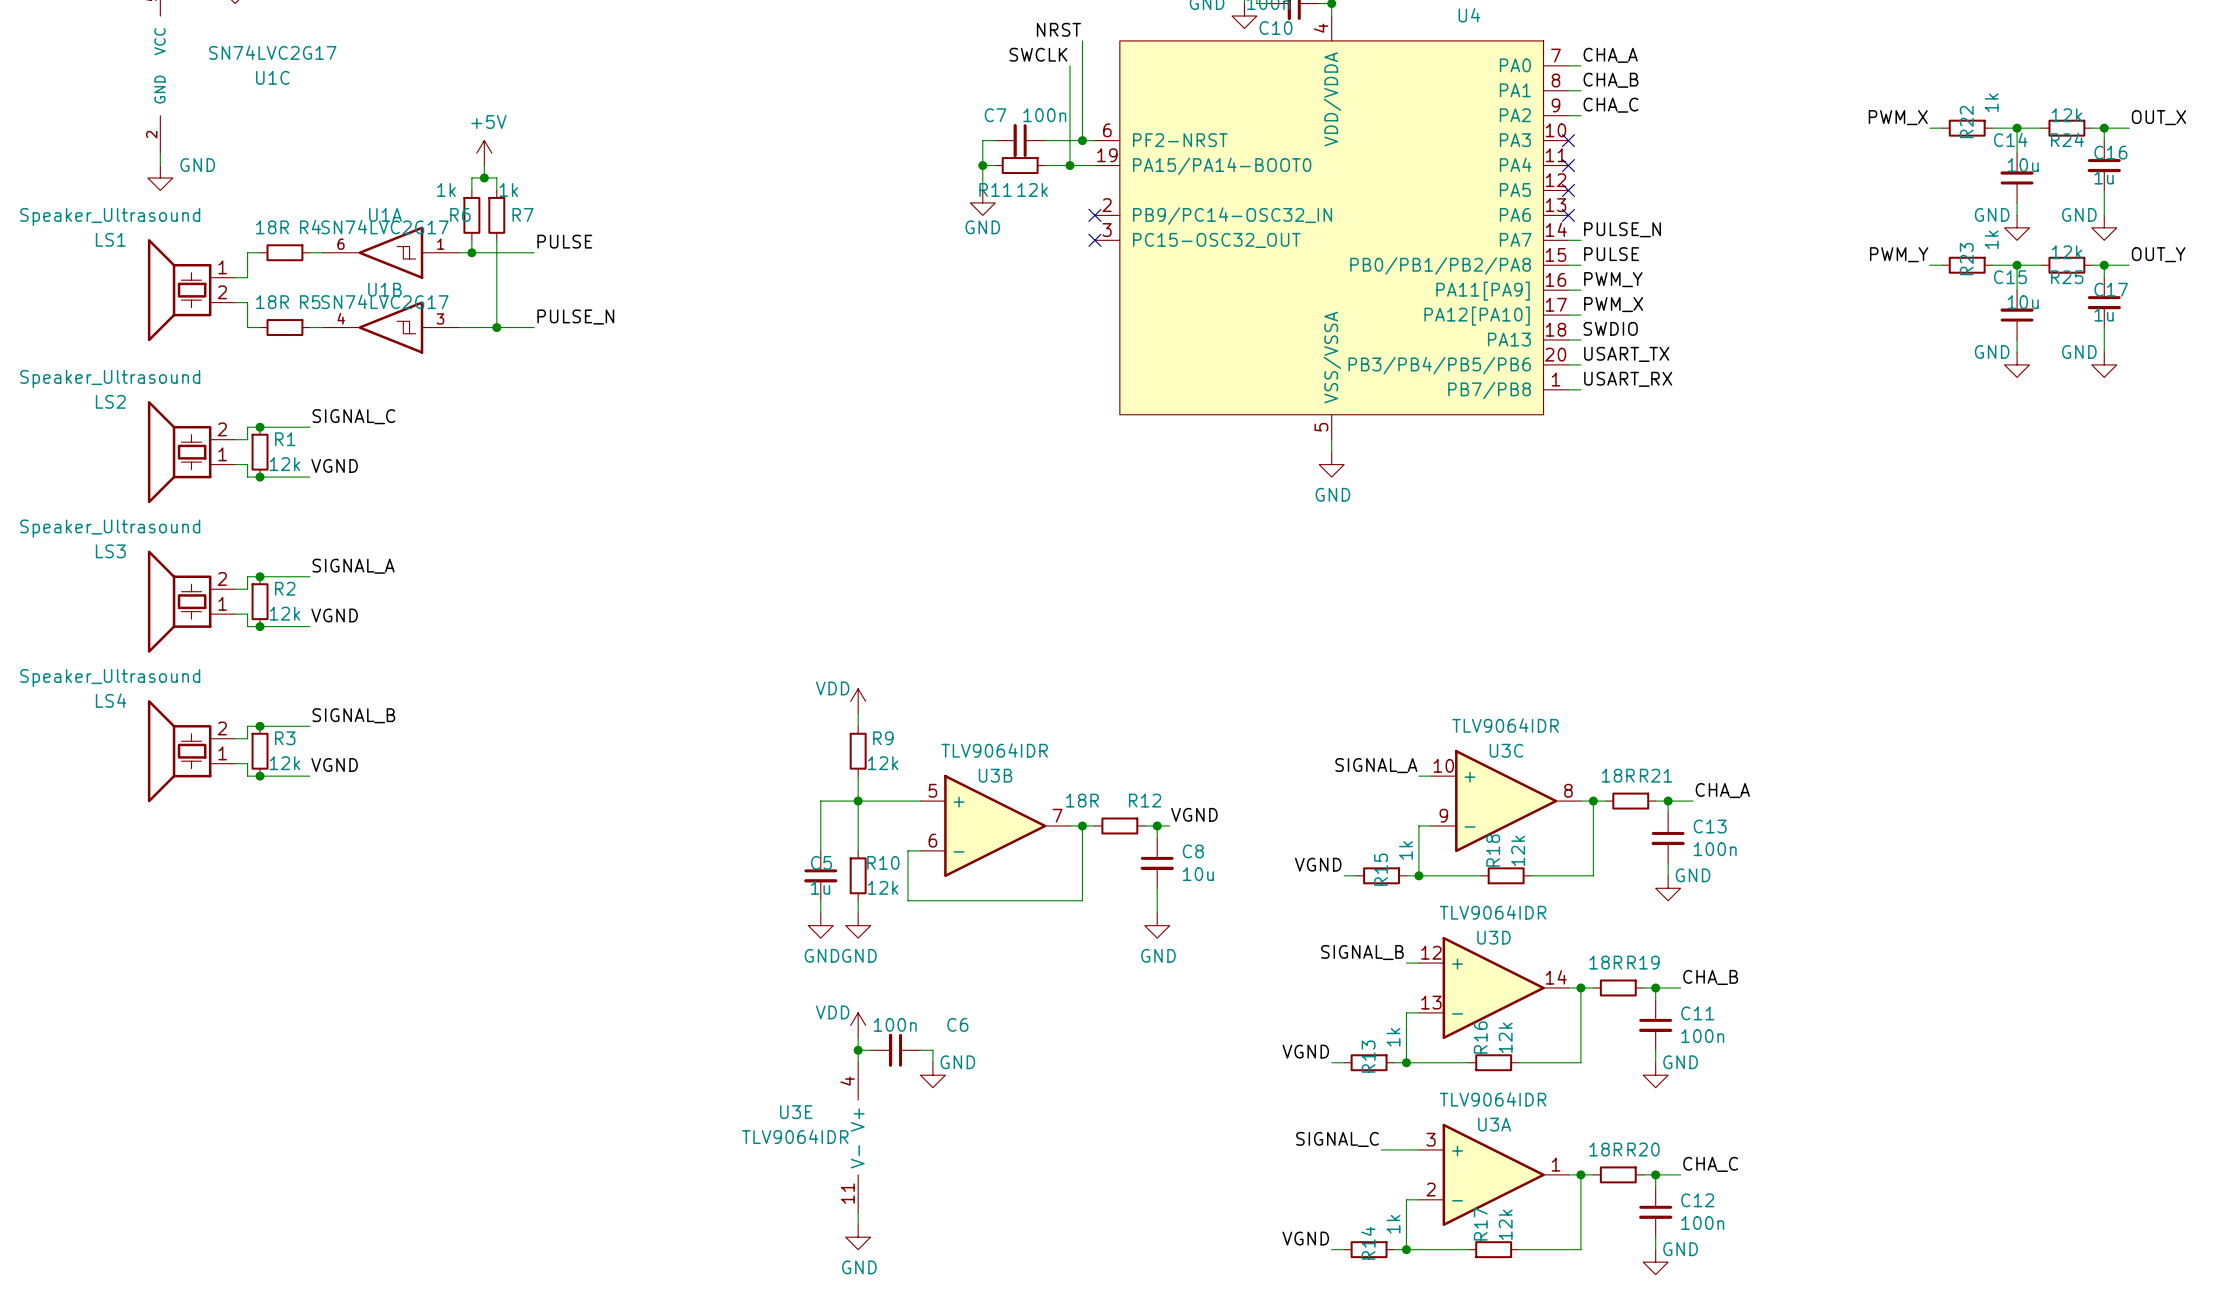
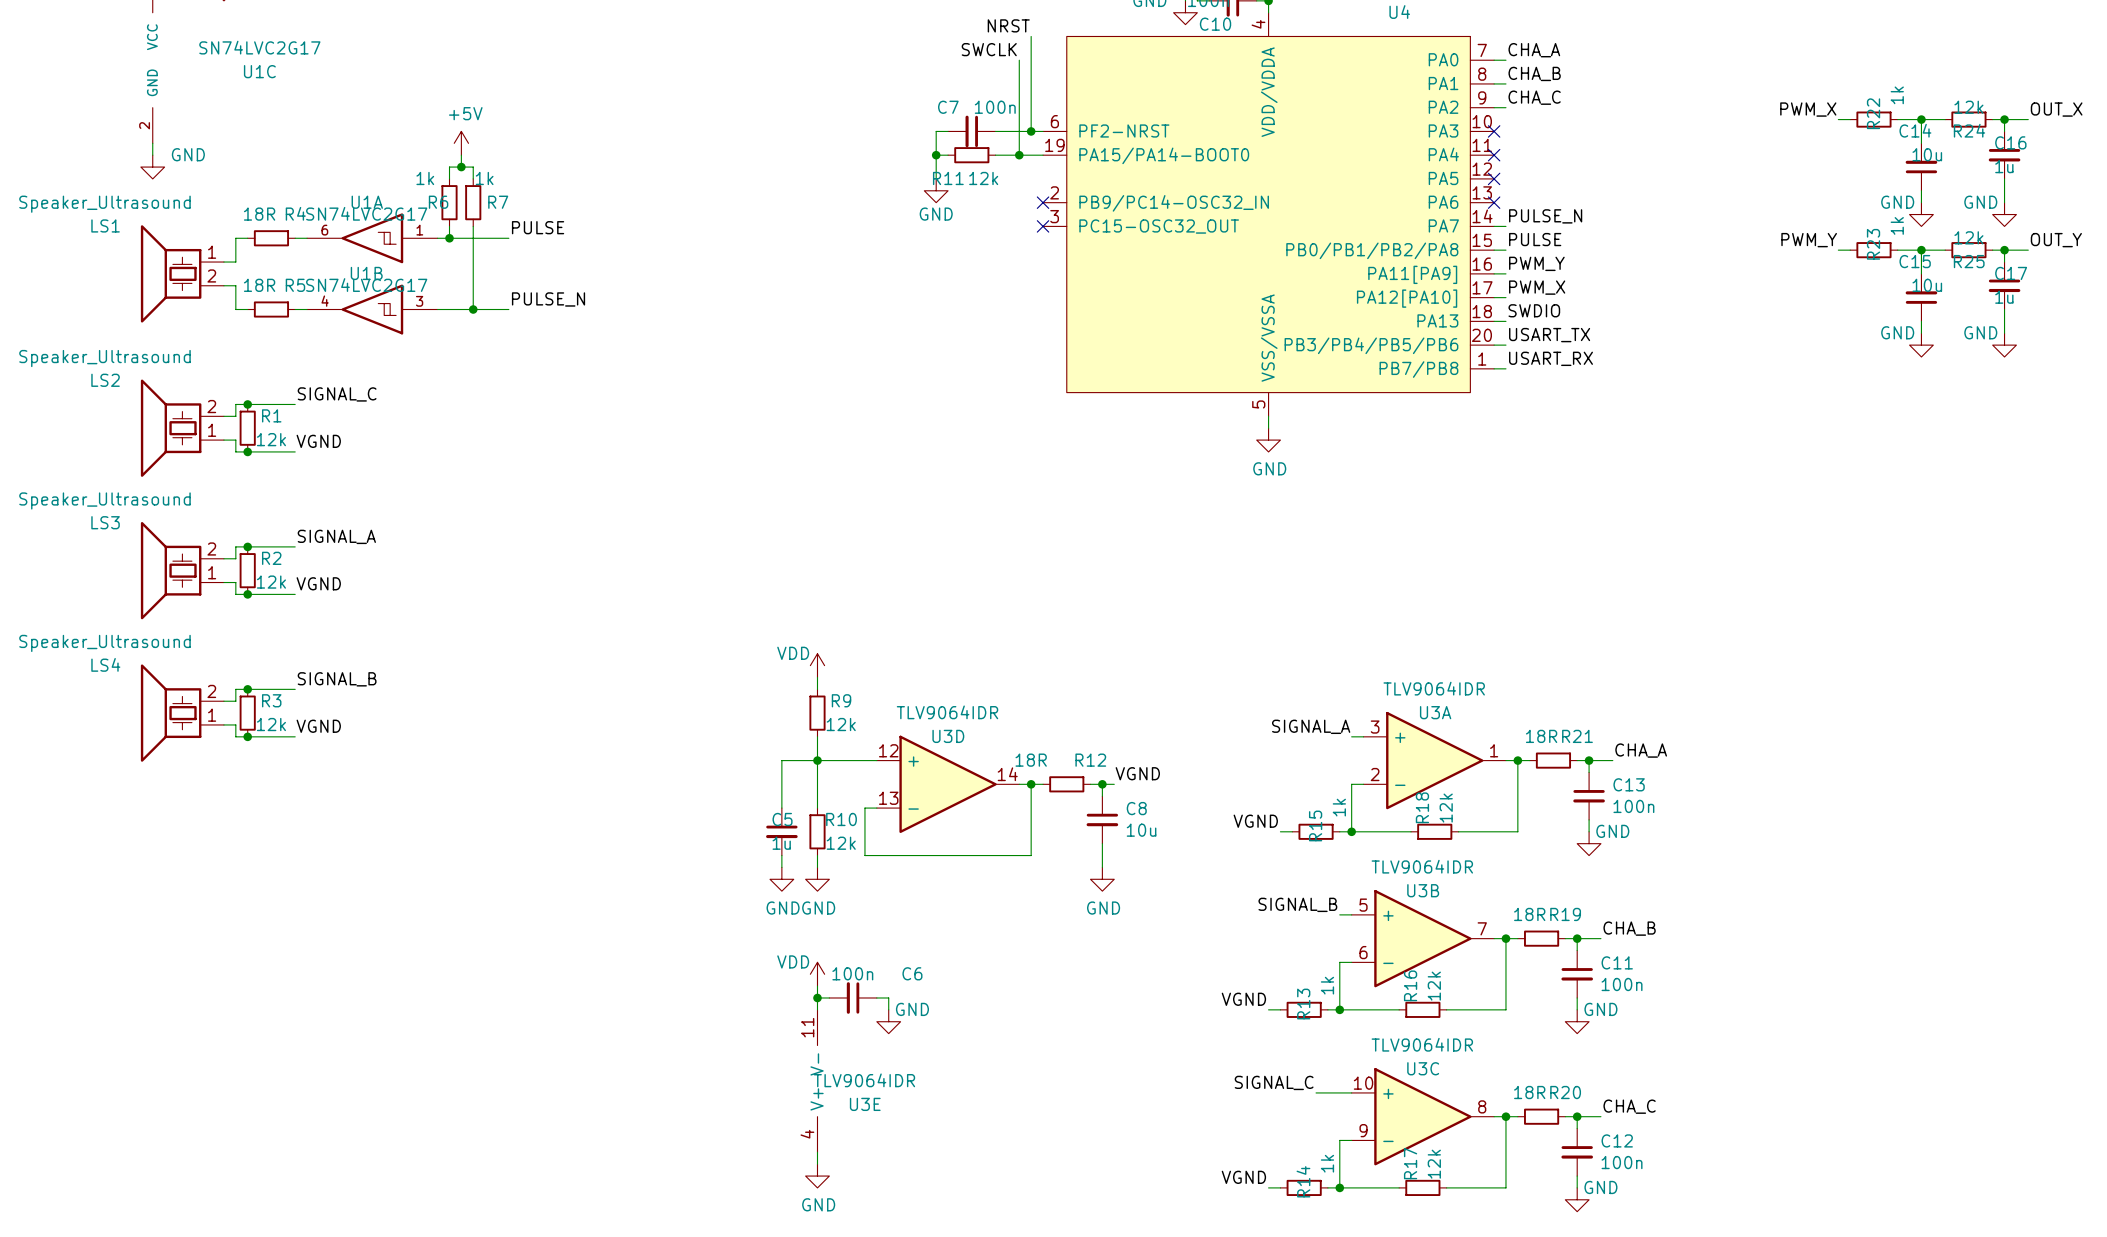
U3C position: (1506, 801) -> (1422, 1116)
U3B position: (995, 825) -> (1422, 938)
U3D position: (1493, 987) -> (948, 784)
U3E rotation: 0° (858, 1137) -> 180° (817, 1081)
U3A position: (1493, 1174) -> (1434, 760)

